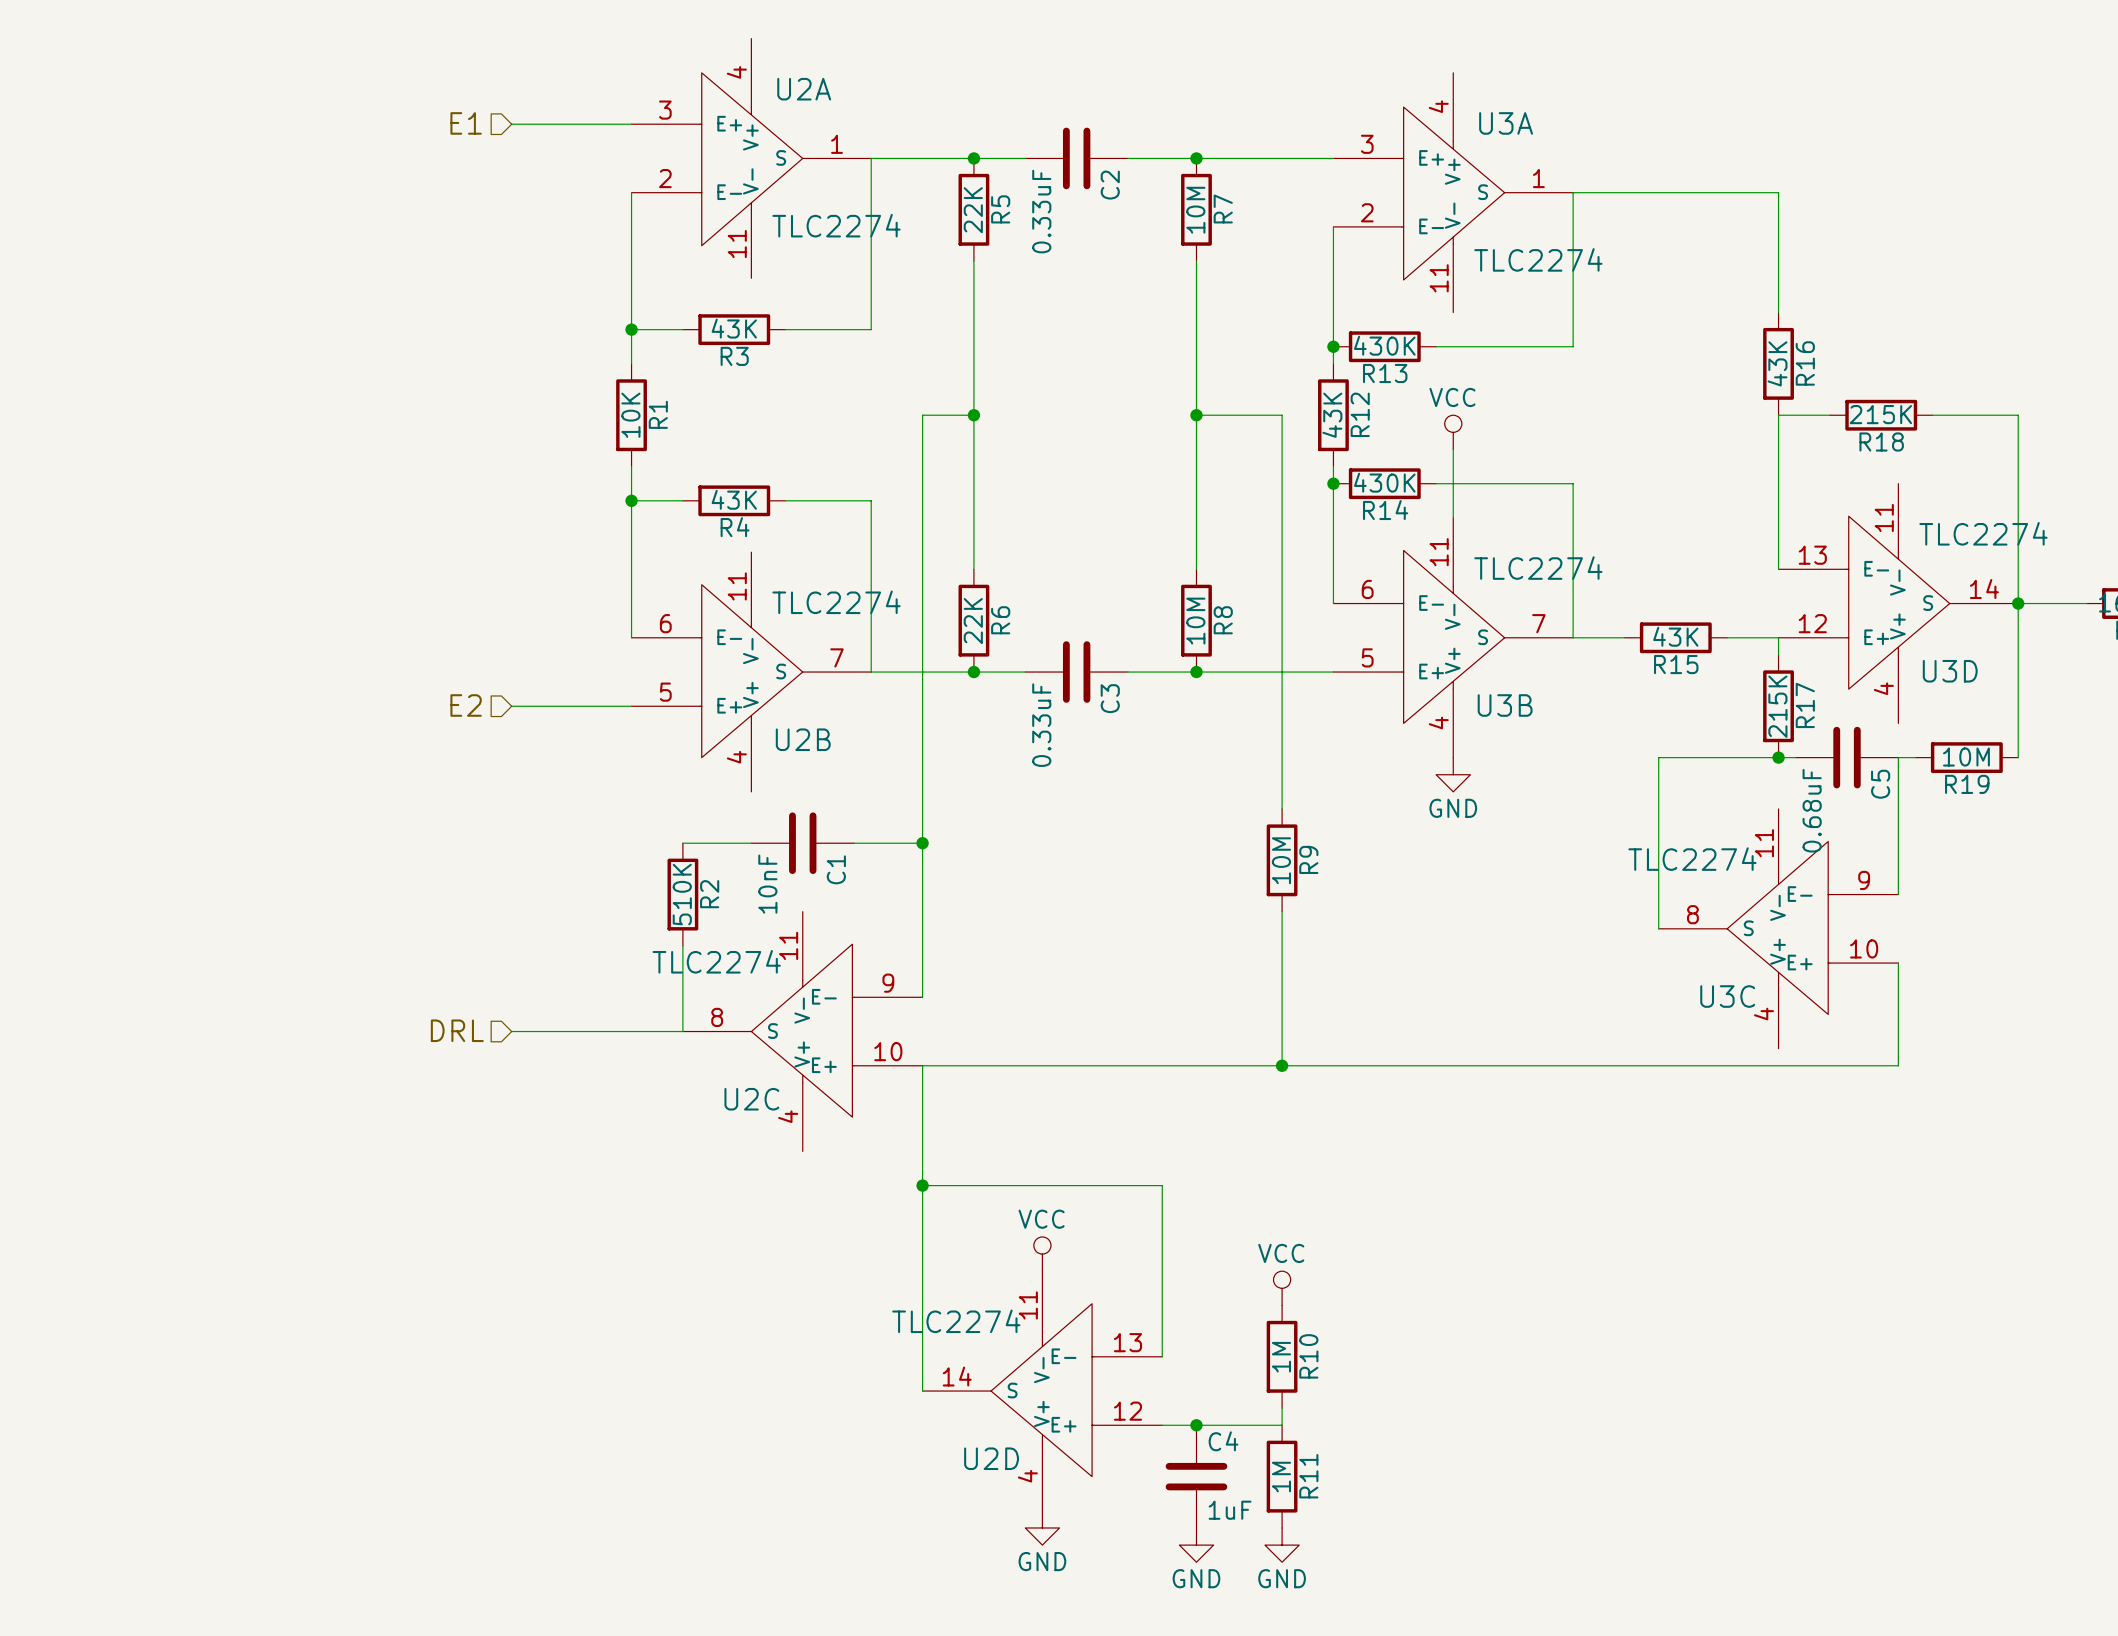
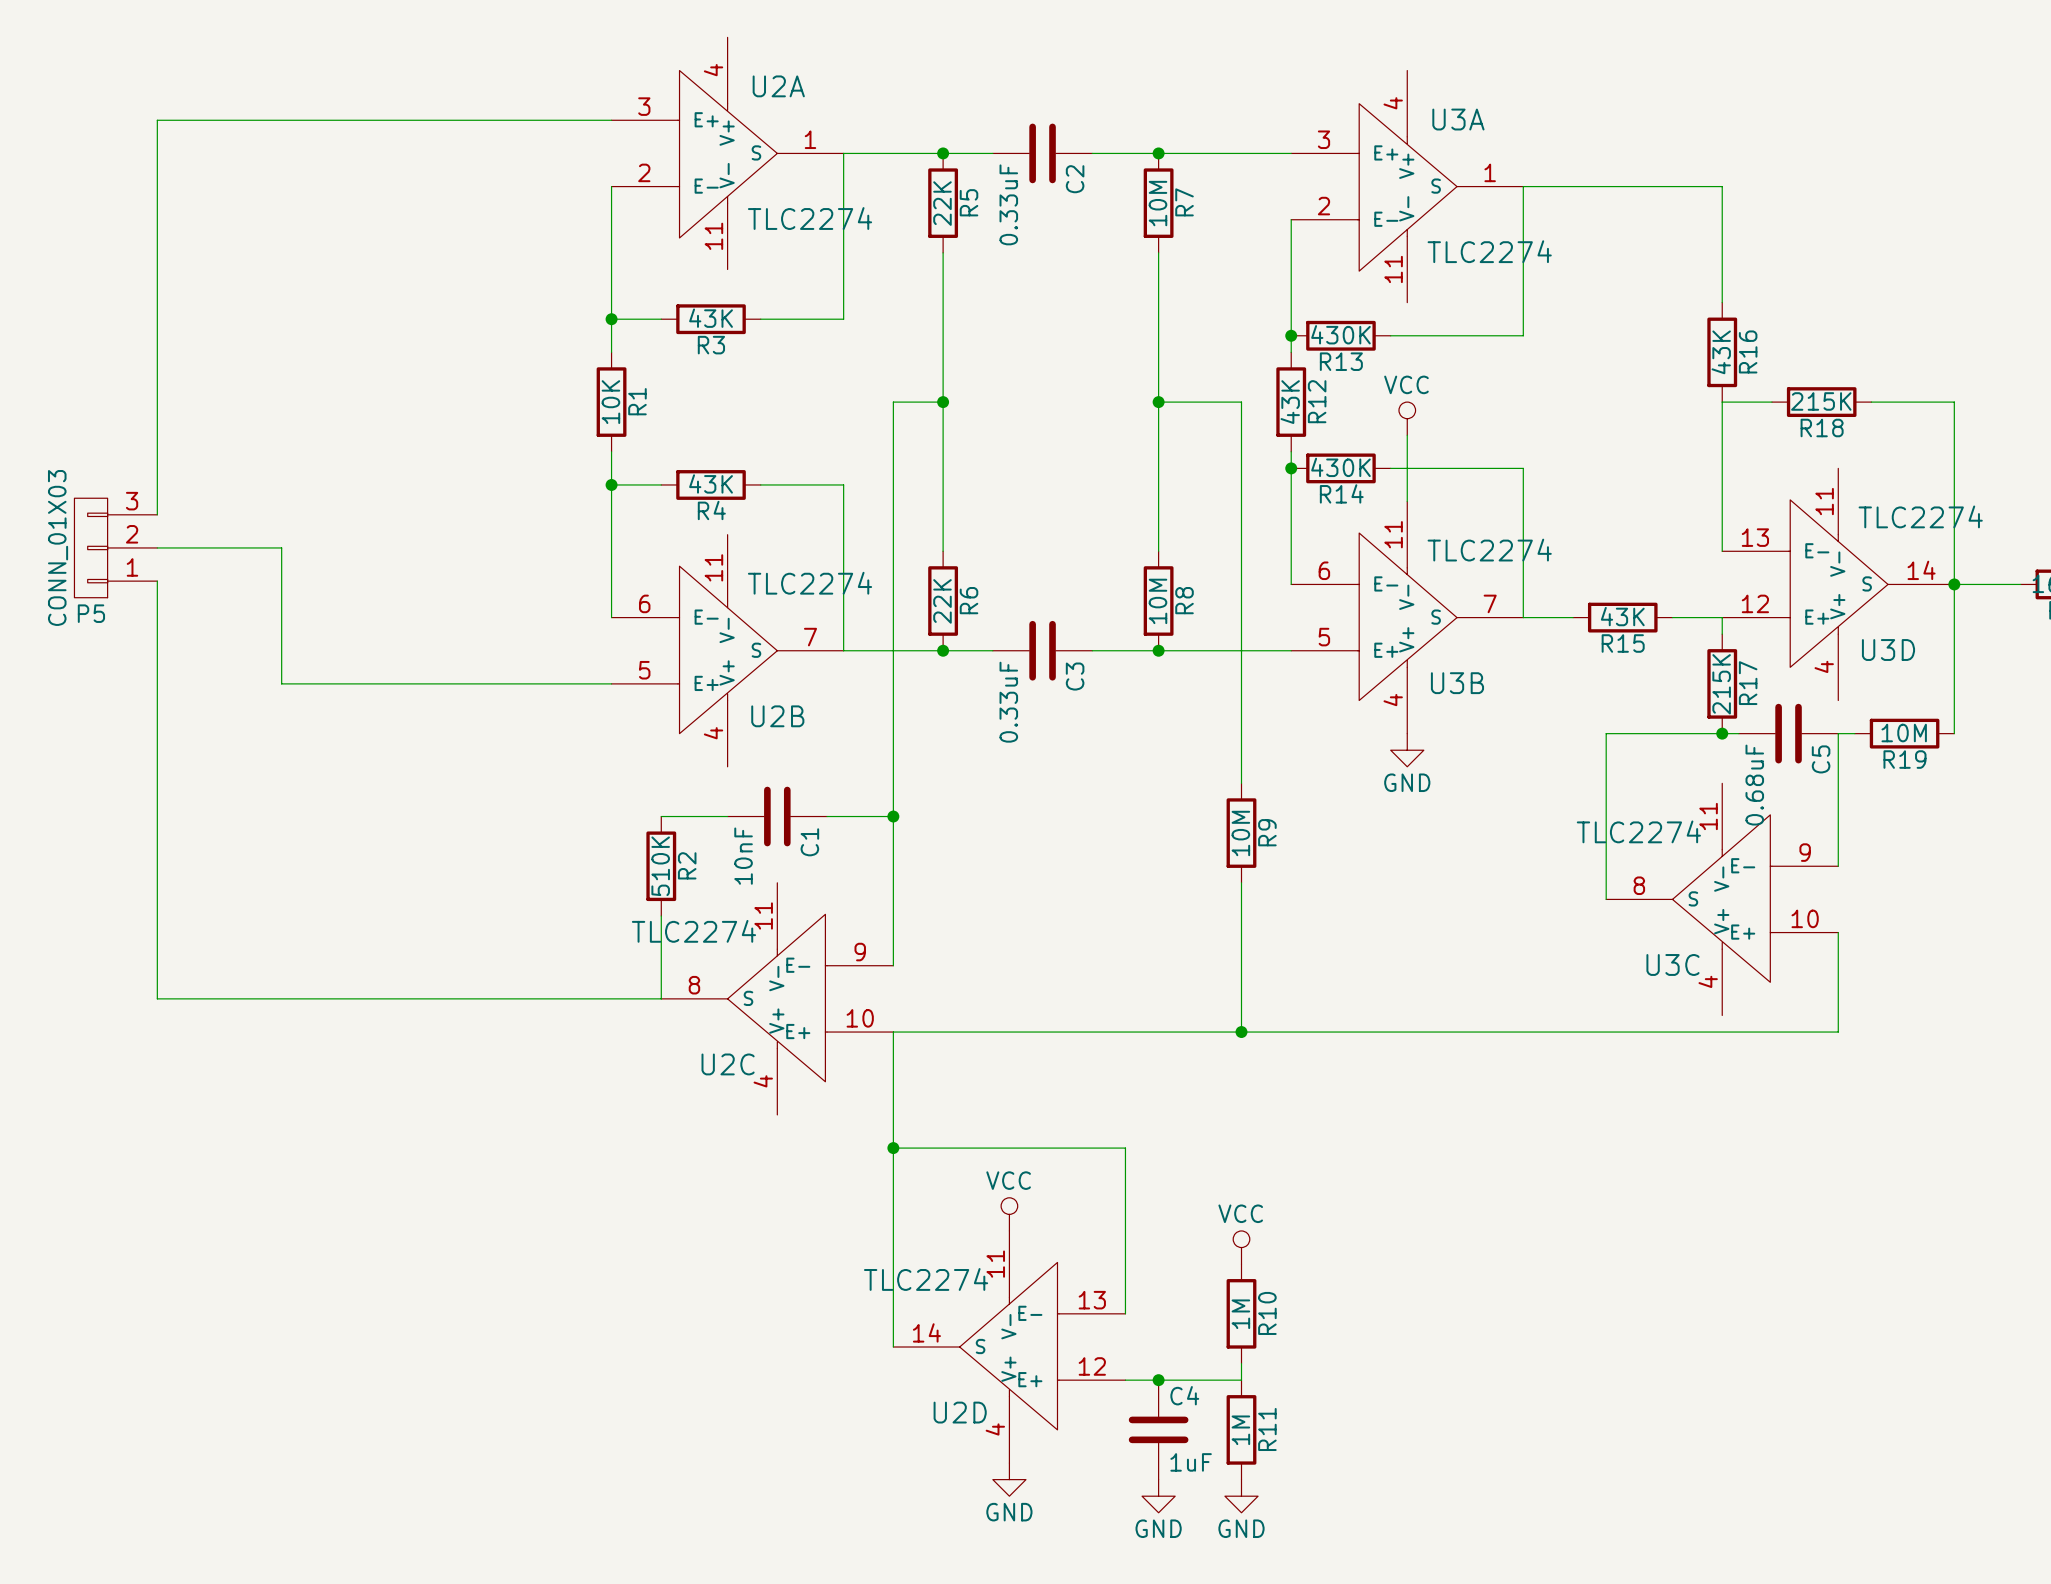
hierarchical label: E1 (466, 123) -> none
wire: none -> (495, 120) (157, 120) (157, 514)
P5: none -> CONN_01X03 (115, 547)
wire: none -> (157, 547) (281, 547) (281, 683) (495, 683)
wire: none -> (157, 581) (157, 998) (495, 998)
hierarchical label: E2 (466, 705) -> none
hierarchical label: DRL (457, 1030) -> none

